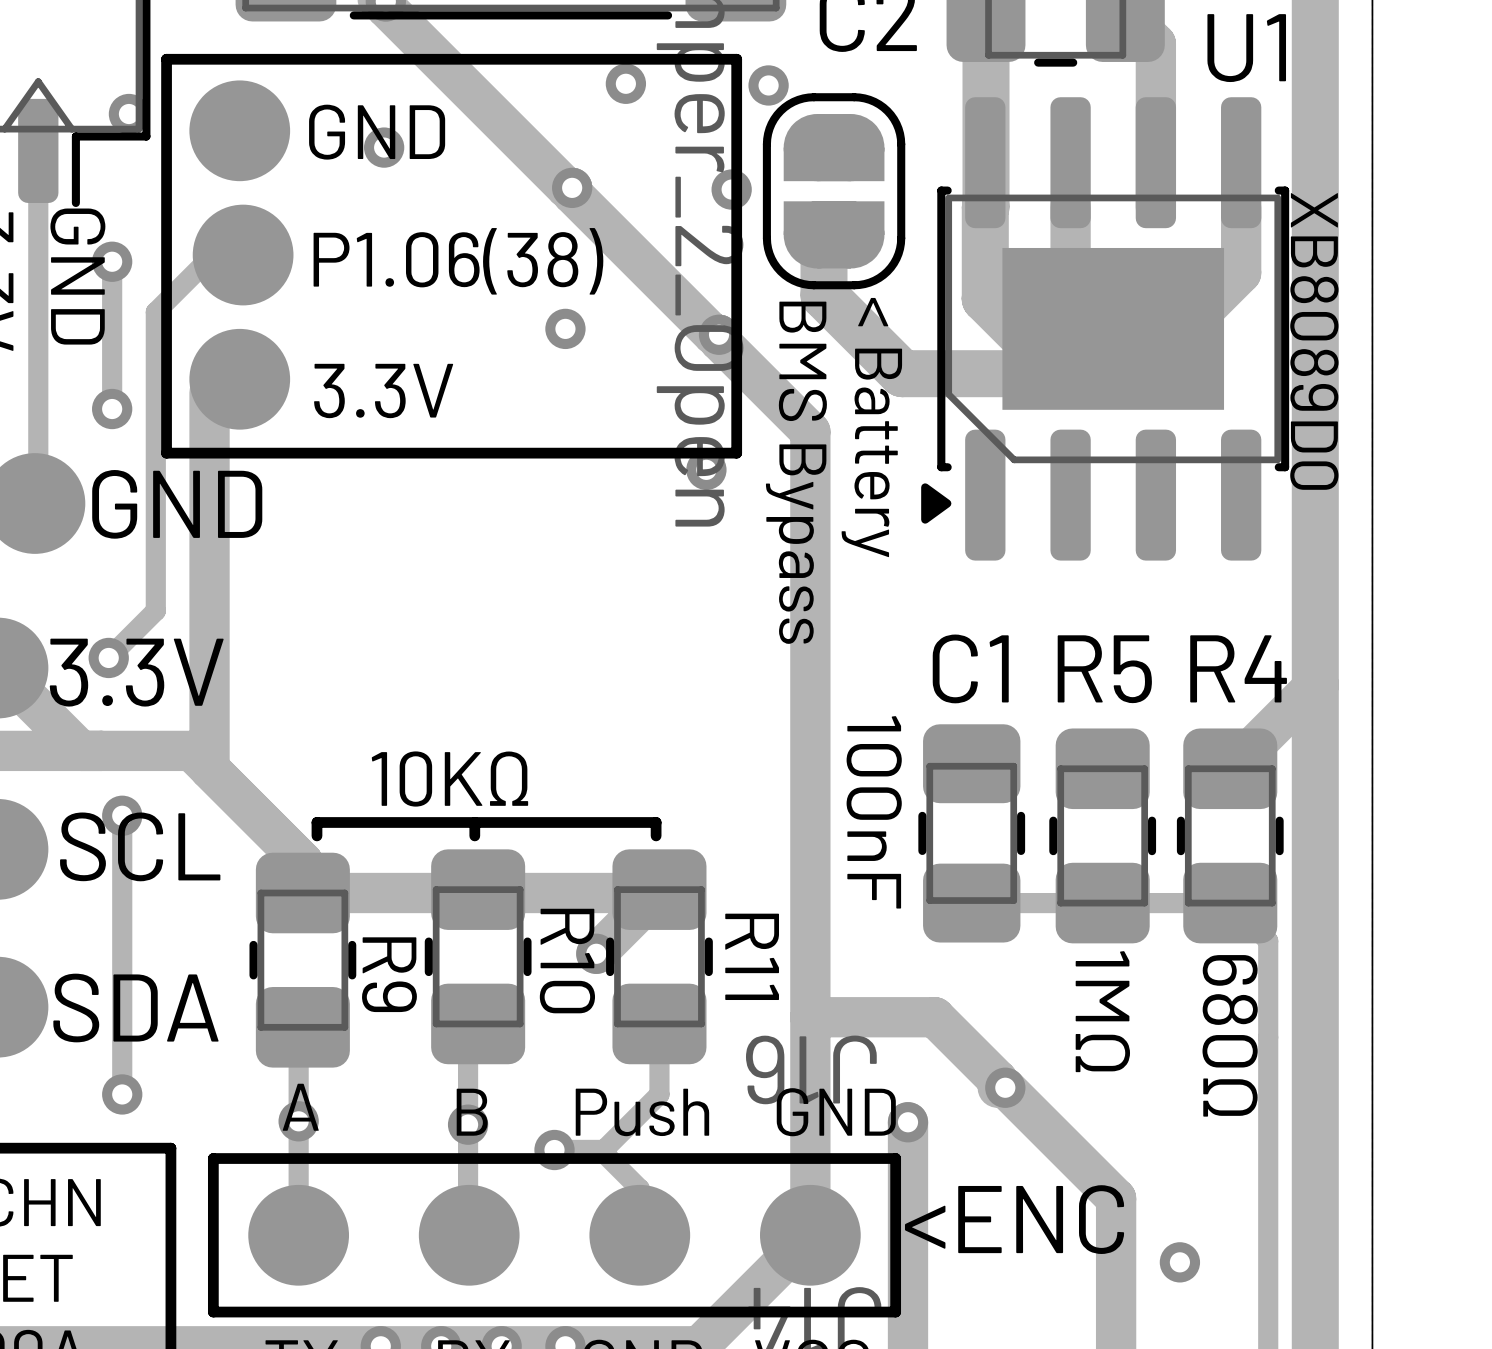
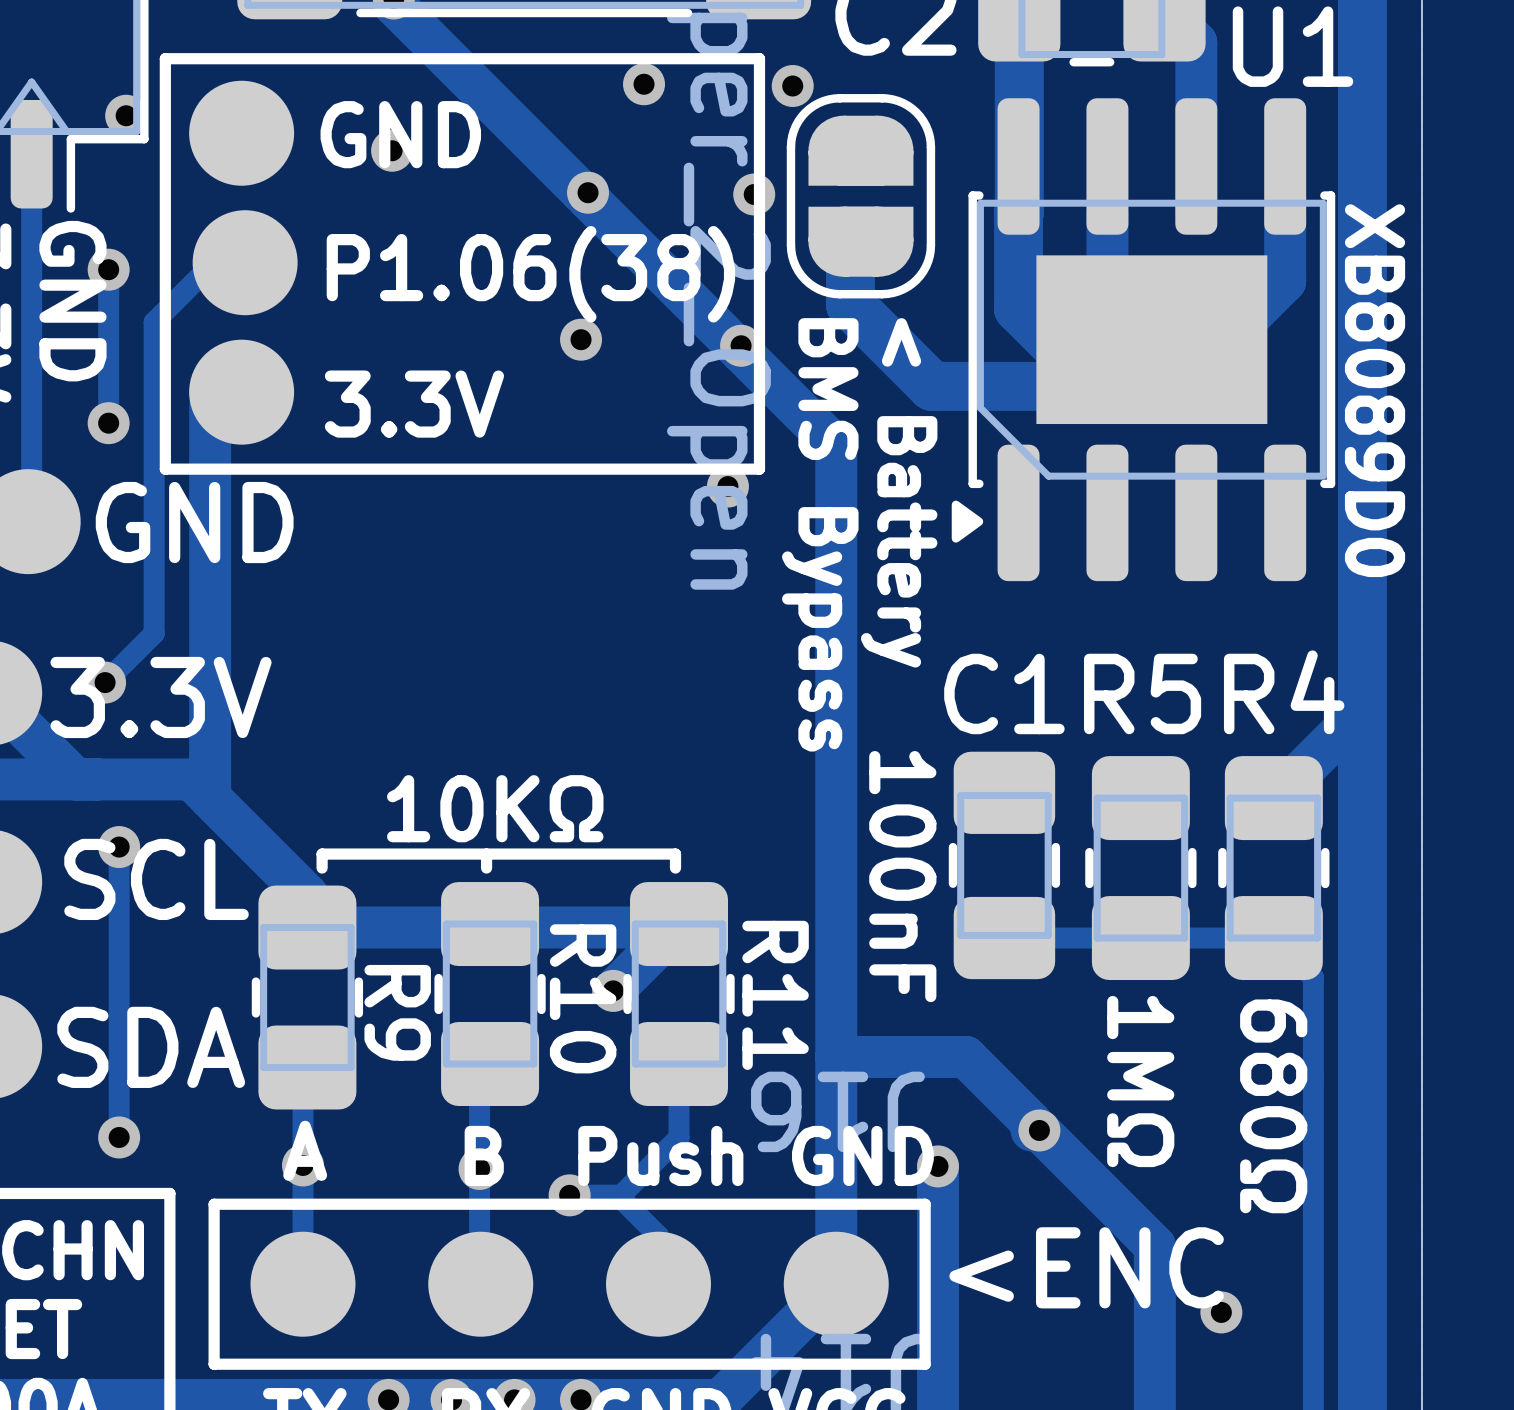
text position: XB8089D0 (1314, 341) -> XB8089D0 (1375, 390)

